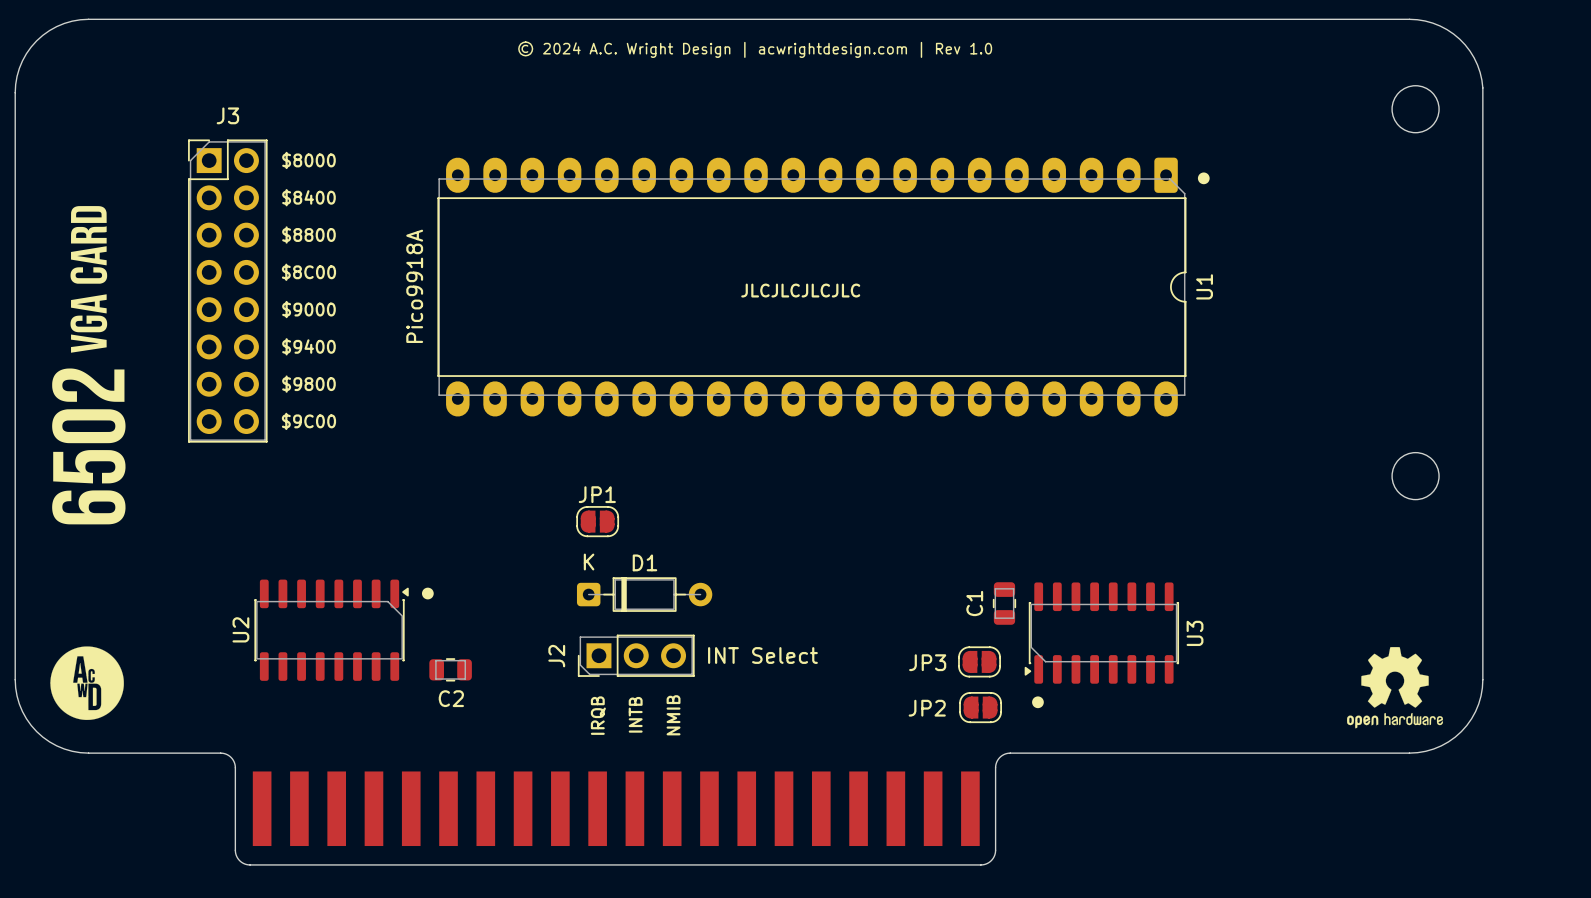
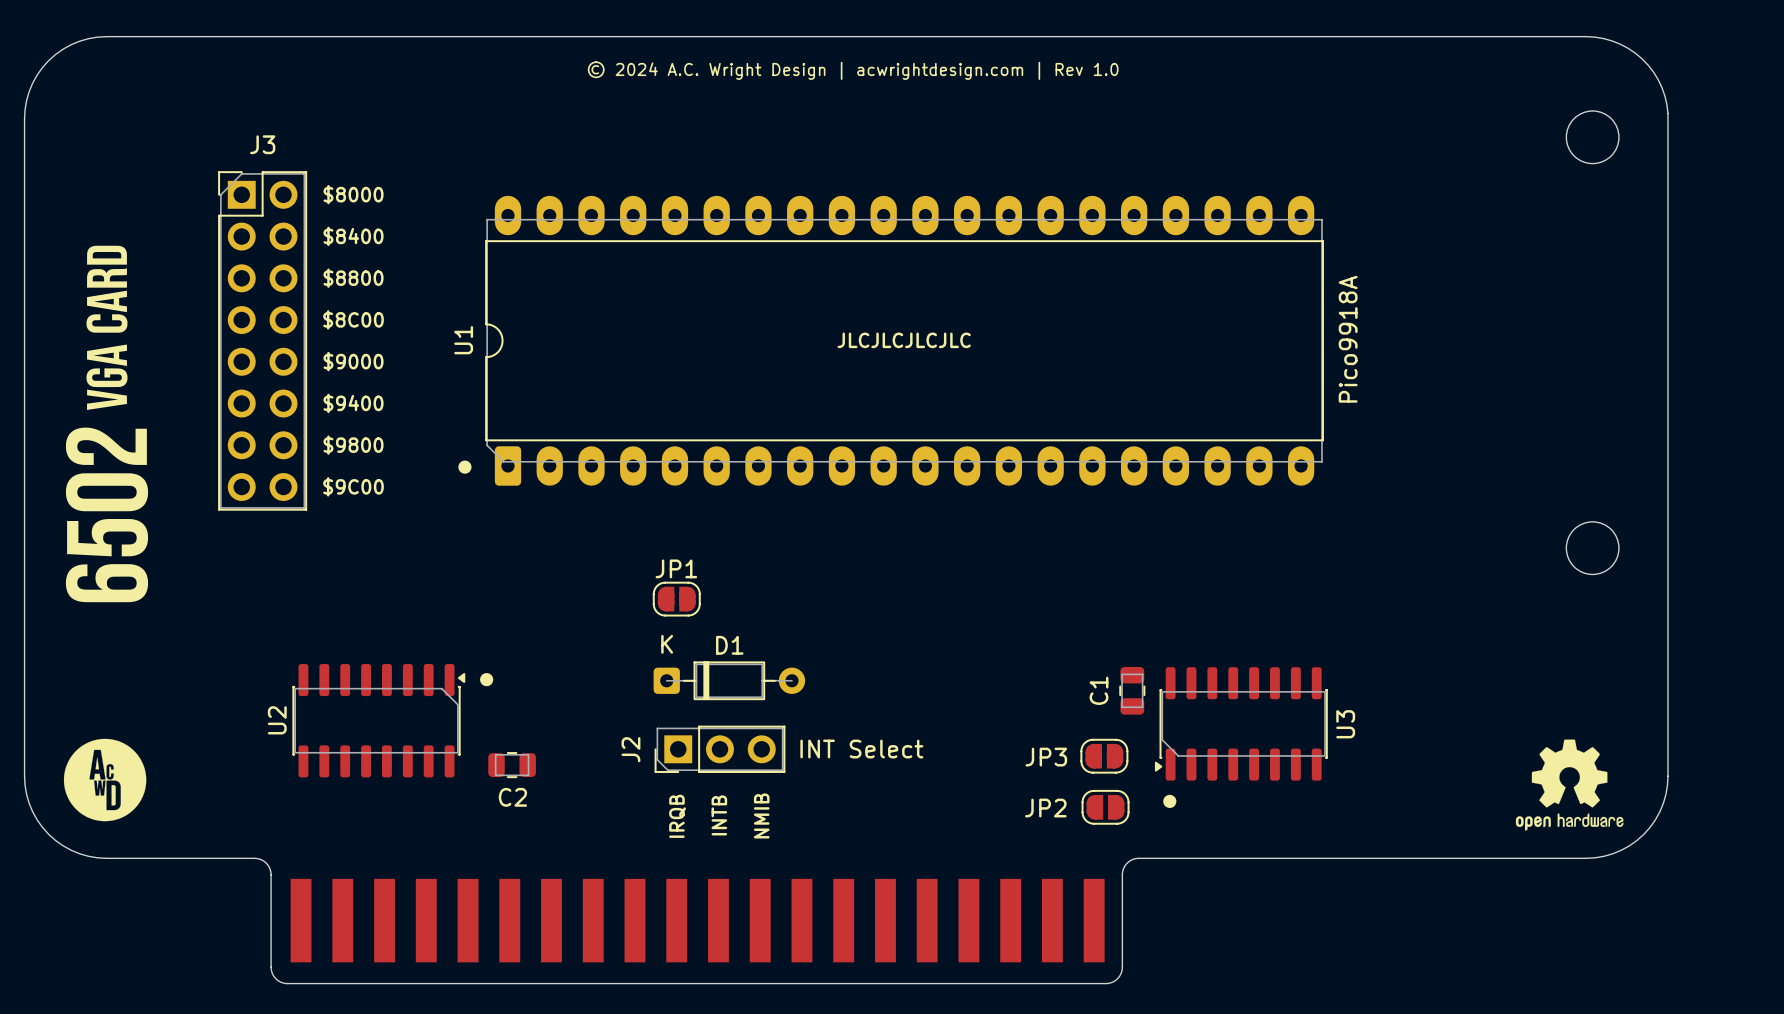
drawing: [1197, 172, 1210, 185] -> none
U1 rotation: 0° (811, 287) -> 180° (904, 340)
drawing: none -> [458, 460, 472, 474]

